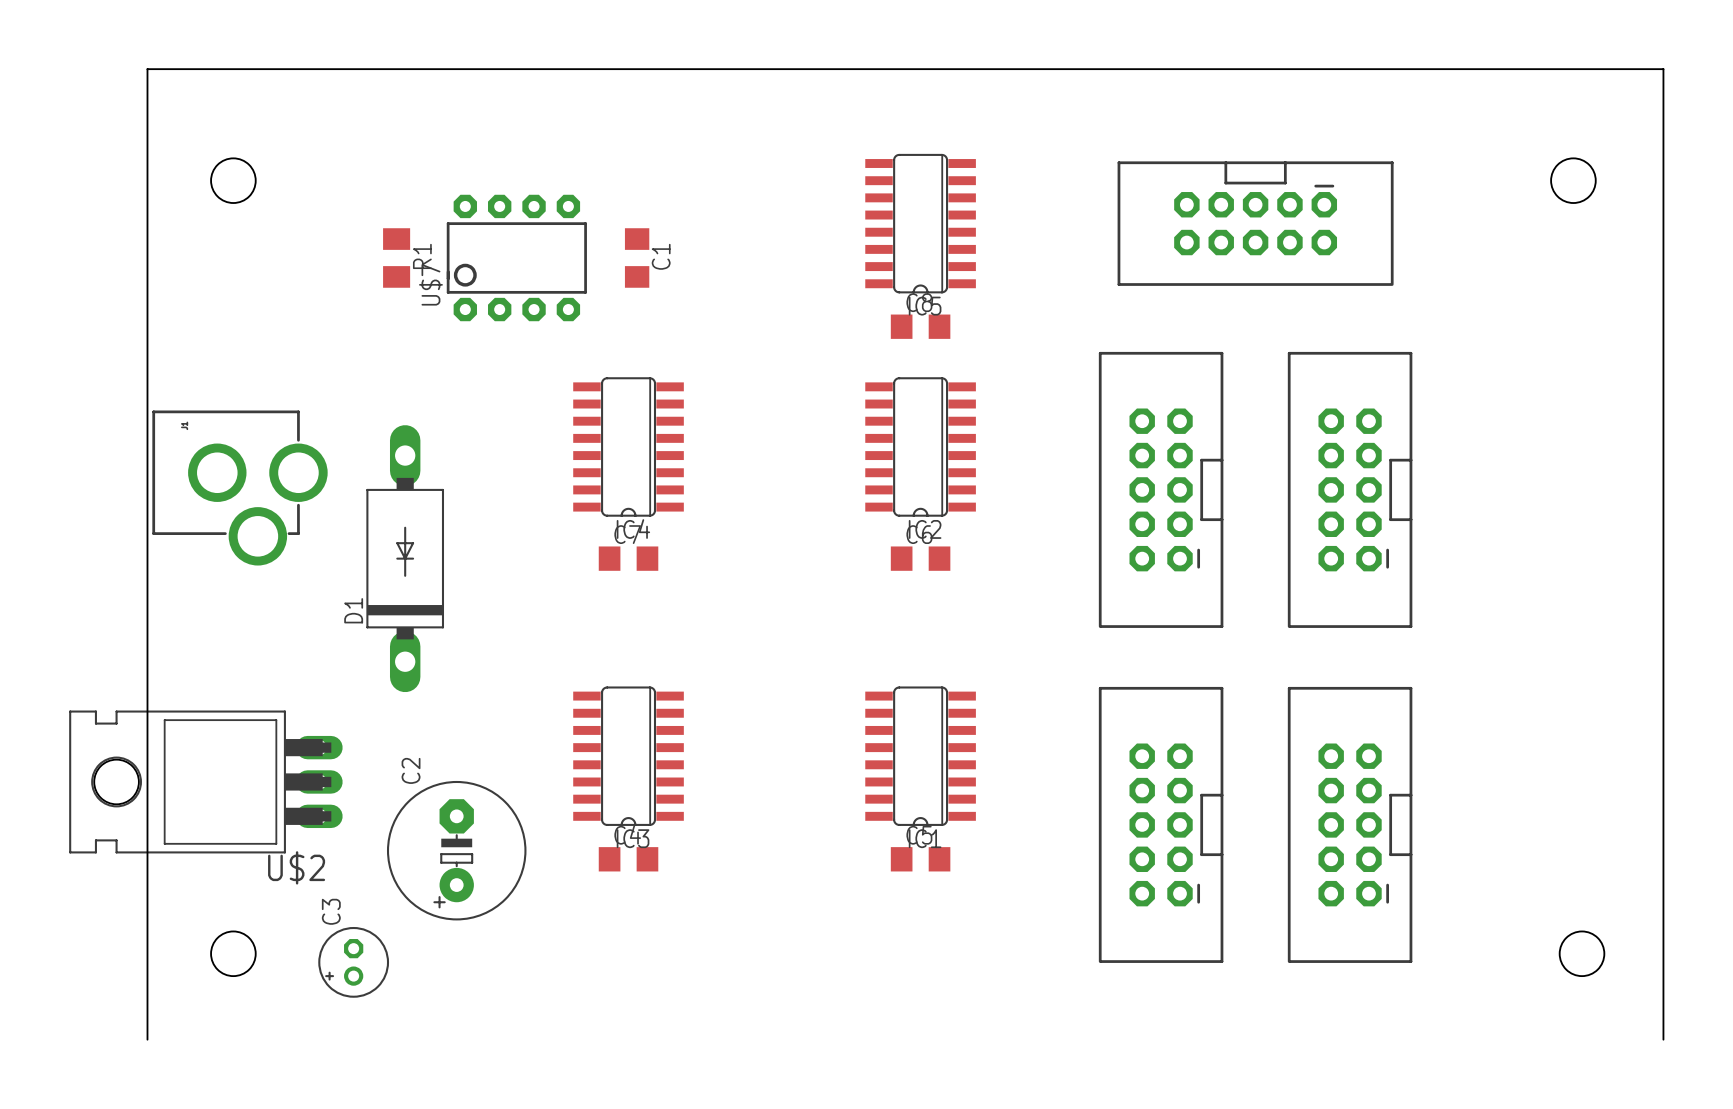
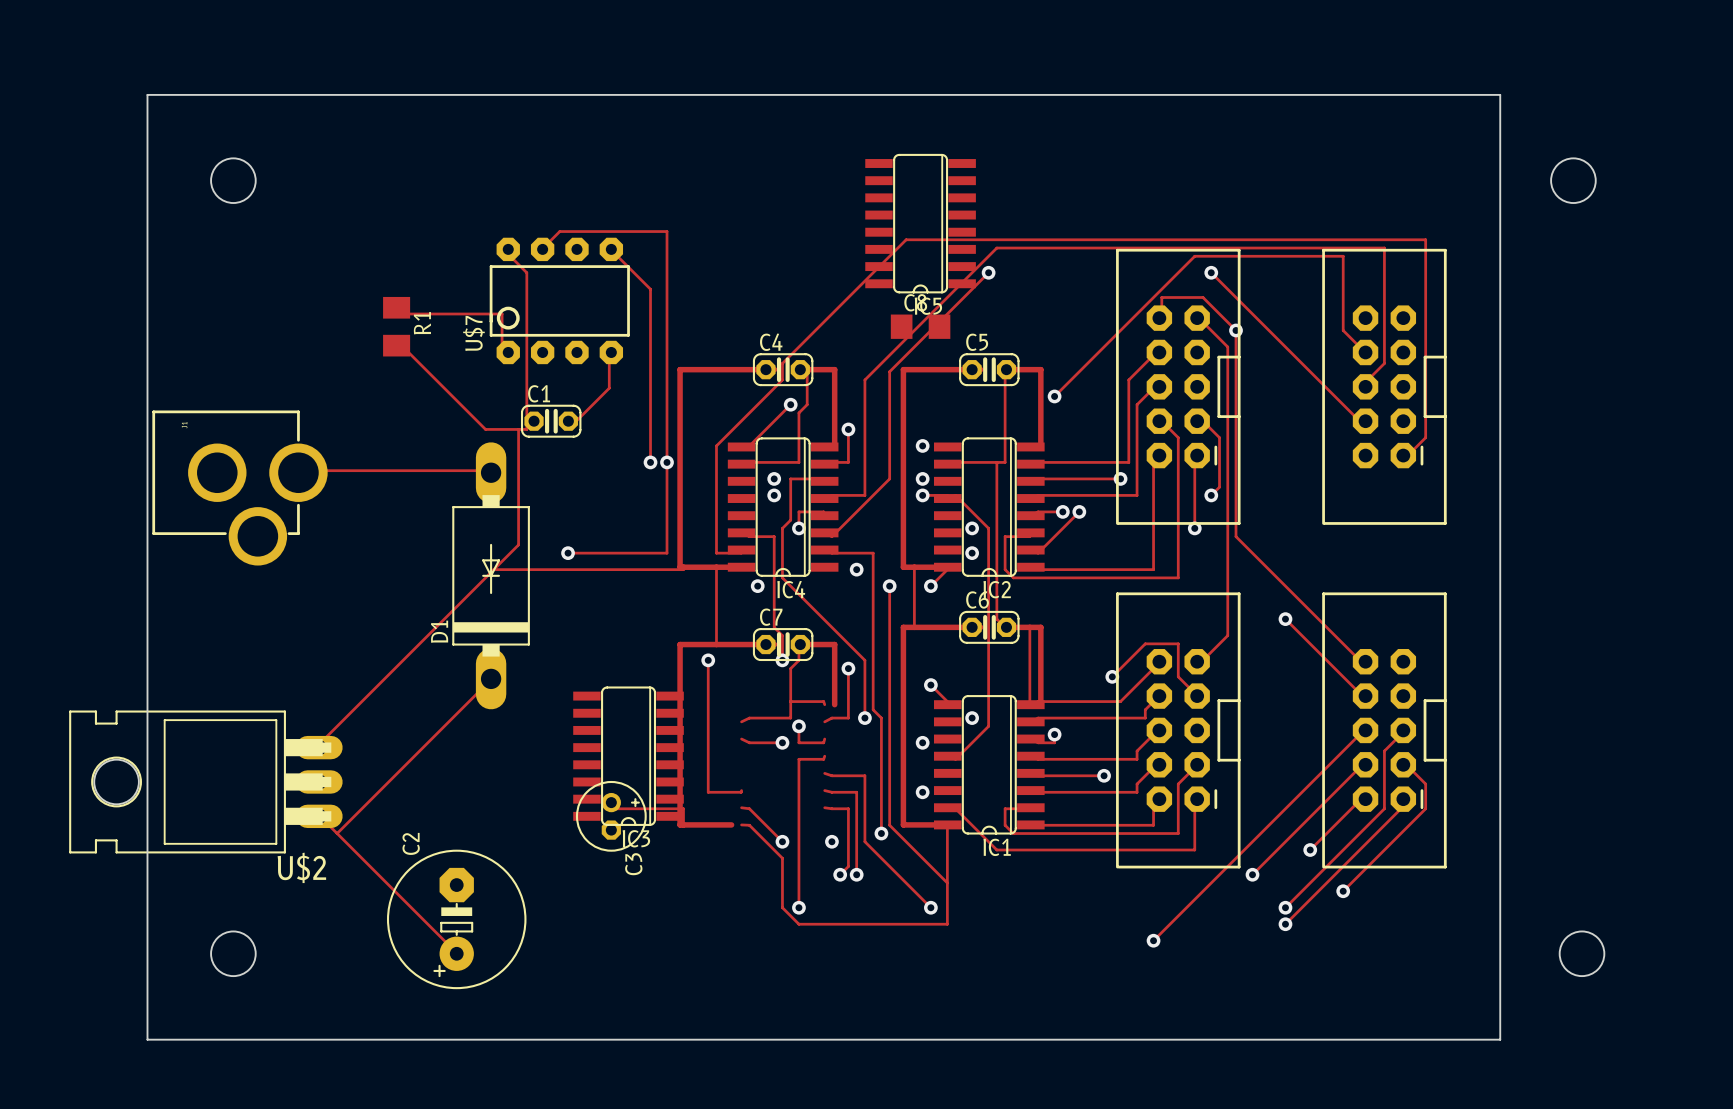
board edge: (147, 94) (147, 69) (1663, 69) (1663, 1039) -> (147, 94) (1500, 94) (1500, 1039) (147, 1039)
part: (1255, 223) -> none
C1 footprint: [624, 228, 650, 288] -> [520, 404, 582, 438]
track: none -> (508, 249) (510, 256) (526, 272) (526, 429) (485, 429) (403, 346) (396, 345)
track: none -> (542, 249) (559, 231) (667, 231) (667, 553) (568, 553)
track: none -> (611, 249) (650, 289) (650, 462)
C1 name position: C1 (661, 256) -> C1 (539, 393)
R1 position: (396, 257) -> (396, 326)
U$7 position: (516, 257) -> (559, 300)
track: none -> (988, 272) (889, 371) (889, 478) (831, 536) (824, 532)
via: none -> (988, 272)
track: none -> (1211, 272) (1359, 421) (1365, 421)
via: none -> (1211, 272)
track: none -> (396, 307) (403, 314) (502, 314) (502, 346) (508, 352)
track: none -> (1159, 318) (1161, 314) (1161, 297) (1203, 297) (1236, 330) (1236, 536) (1359, 660) (1365, 661)
track: none -> (1197, 318) (1227, 346) (1227, 635) (1203, 660) (1197, 661)
via: none -> (1236, 330)
track: none -> (611, 352) (609, 355) (609, 388) (576, 421) (568, 421)
track: none -> (1159, 352) (1153, 355) (1128, 379) (1128, 462) (1038, 462) (1030, 464)
track: none -> (1365, 352) (1343, 330) (1343, 256) (1194, 256) (1054, 396)
track: none -> (774, 369) (680, 369) (680, 567) (731, 567)
track: none -> (980, 369) (903, 369) (903, 567) (937, 567)
track: none -> (1159, 386) (1153, 388) (1137, 404) (1137, 495) (1038, 495) (1030, 498)
part: none -> (1178, 386)
track: none -> (1365, 386) (1367, 379) (1384, 363) (1384, 248) (996, 248) (864, 379) (864, 495) (831, 495) (824, 498)
part: none -> (1384, 386)
via: none -> (1054, 396)
track: none -> (790, 404) (749, 445) (741, 446)
via: none -> (790, 404)
track: none -> (1159, 421) (1161, 421) (1178, 437) (1178, 577) (1013, 577) (1005, 569) (1005, 536) (1029, 536) (1030, 532)
track: none -> (1197, 421) (1203, 421) (1219, 437) (1219, 487) (1211, 495)
track: none -> (518, 429) (518, 544) (320, 742) (319, 747)
track: none -> (848, 429) (848, 462) (824, 464)
via: none -> (848, 429)
via: none -> (922, 445)
IC4 position: (628, 446) -> (783, 507)
track: none -> (834, 446) (834, 369) (800, 369) (807, 371) (807, 404) (798, 412) (798, 462) (741, 464)
IC2 position: (920, 446) -> (989, 507)
track: none -> (1040, 446) (1040, 369) (1006, 369) (1005, 462) (947, 464)
track: none -> (1159, 455) (1153, 462) (1153, 569) (1038, 569) (1030, 567)
track: none -> (1197, 455) (1194, 462) (1194, 528)
track: none -> (1403, 455) (1409, 454) (1425, 437) (1425, 239) (906, 239) (782, 363) (782, 379) (716, 445) (716, 553) (741, 553) (741, 550)
via: none -> (650, 462)
via: none -> (667, 462)
track: none -> (996, 462) (996, 619) (1005, 627) (1040, 627) (1040, 704)
track: none -> (298, 472) (304, 470) (485, 470) (491, 472)
via: none -> (774, 478)
via: none -> (922, 478)
track: none -> (1120, 478) (1038, 478) (1030, 481)
via: none -> (1120, 478)
track: none -> (824, 481) (823, 478) (790, 478) (790, 520) (782, 528) (782, 577) (864, 660) (864, 718)
part: (1161, 489) -> none
part: (1350, 489) -> none
via: none -> (774, 495)
track: none -> (922, 495) (947, 495) (947, 498) (955, 495) (988, 528) (988, 726) (955, 759) (947, 756)
via: none -> (922, 495)
via: none -> (1211, 495)
track: none -> (1062, 511) (1038, 511) (1030, 515)
via: none -> (1062, 511)
track: none -> (1079, 511) (1038, 553) (1030, 550)
via: none -> (1079, 511)
track: none -> (824, 515) (823, 511) (798, 511) (798, 528)
via: none -> (798, 528)
via: none -> (972, 528)
via: none -> (1194, 528)
track: none -> (741, 532) (749, 536) (774, 536) (774, 627) (782, 635) (782, 660)
C7 footprint: [598, 546, 659, 571] -> [752, 628, 814, 662]
C6 footprint: [890, 546, 951, 571] -> [959, 610, 1020, 644]
track: none -> (824, 550) (831, 553) (873, 553) (873, 709) (881, 718) (881, 833)
via: none -> (568, 553)
via: none -> (972, 553)
D1 position: (405, 558) -> (491, 575)
track: none -> (683, 567) (683, 569) (493, 569)
track: none -> (716, 567) (716, 644)
track: none -> (914, 567) (914, 627)
track: none -> (947, 567) (930, 586)
via: none -> (856, 569)
via: none -> (757, 586)
track: none -> (889, 586) (889, 825) (947, 882)
via: none -> (889, 586)
via: none -> (930, 586)
track: none -> (1285, 619) (1359, 693) (1365, 696)
via: none -> (1285, 619)
track: none -> (980, 627) (903, 627) (903, 824) (937, 824)
track: none -> (1029, 627) (1030, 704) (1038, 701) (1120, 701) (1159, 661)
track: none -> (774, 644) (680, 644) (680, 824) (731, 824)
track: none -> (708, 660) (708, 792) (741, 792) (741, 790)
via: none -> (708, 660)
via: none -> (782, 660)
track: none -> (848, 668) (848, 718) (831, 718) (824, 721)
via: none -> (848, 668)
track: none -> (1112, 676) (1145, 643) (1178, 643) (1178, 676) (1197, 696)
via: none -> (1112, 676)
track: none -> (491, 678) (337, 833)
track: none -> (930, 685) (947, 701) (947, 704)
via: none -> (930, 685)
track: none -> (1159, 696) (1145, 709) (1145, 718) (1038, 718) (1030, 721)
track: none -> (790, 701) (823, 701) (824, 704)
track: none -> (834, 704) (834, 644) (800, 644) (798, 660) (790, 668) (790, 718) (749, 718) (741, 721)
via: none -> (864, 718)
via: none -> (972, 718)
track: none -> (798, 726) (798, 742) (823, 742) (824, 739)
via: none -> (798, 726)
track: none -> (1159, 730) (1137, 751) (1137, 759) (1038, 759) (1030, 756)
track: none -> (1365, 730) (1153, 940)
part: none -> (1384, 730)
track: none -> (1403, 730) (1384, 751) (1384, 808) (1285, 907)
track: none -> (1054, 734) (1054, 742) (1038, 742) (1030, 739)
via: none -> (1054, 734)
track: none -> (741, 739) (749, 742) (782, 742)
via: none -> (782, 742)
via: none -> (922, 742)
track: none -> (824, 756) (823, 759) (798, 759) (798, 907)
IC1 position: (920, 756) -> (989, 764)
track: none -> (1159, 764) (1153, 767) (1137, 784) (1137, 792) (1038, 792) (1030, 790)
track: none -> (1197, 764) (1178, 784) (1178, 833) (1013, 833) (1005, 825) (1005, 808) (1030, 807)
track: none -> (1365, 764) (1359, 767) (1252, 874)
track: none -> (1403, 764) (1409, 767) (1425, 784) (1425, 808) (1343, 891)
track: none -> (824, 773) (831, 775) (864, 775) (864, 841) (930, 907)
track: none -> (1030, 773) (1038, 775) (1104, 775)
via: none -> (1104, 775)
track: none -> (824, 790) (856, 792) (856, 874)
via: none -> (922, 792)
track: none -> (1159, 799) (1153, 800) (1153, 825) (1030, 824)
track: none -> (1197, 799) (1194, 800) (1194, 850) (996, 850) (955, 808) (947, 807)
track: none -> (1365, 799) (1359, 800) (1310, 850)
track: none -> (1403, 799) (1400, 800) (1400, 808) (1285, 924)
track: none -> (611, 802) (617, 808) (683, 808) (683, 825)
track: none -> (741, 807) (749, 808) (782, 841)
track: none -> (824, 807) (848, 808) (848, 866) (840, 874)
track: none -> (319, 816) (456, 953)
track: none -> (741, 824) (749, 825) (782, 858) (782, 907) (798, 924) (947, 924) (947, 824)
part position: (1161, 824) -> (1178, 730)
part: (1350, 824) -> none
via: none -> (881, 833)
via: none -> (782, 841)
via: none -> (831, 841)
C4 footprint: [598, 847, 659, 872] -> [752, 353, 814, 387]
C5 footprint: [890, 847, 951, 872] -> [959, 353, 1020, 387]
C2 position: (456, 850) -> (456, 919)
via: none -> (1310, 850)
via: none -> (840, 874)
via: none -> (856, 874)
via: none -> (1252, 874)
via: none -> (1343, 891)
via: none -> (798, 907)
via: none -> (930, 907)
via: none -> (1285, 907)
via: none -> (1285, 924)
via: none -> (1153, 940)
C3 rotation: 0° (353, 962) -> 180° (611, 816)
C3 position: (353, 962) -> (611, 816)

